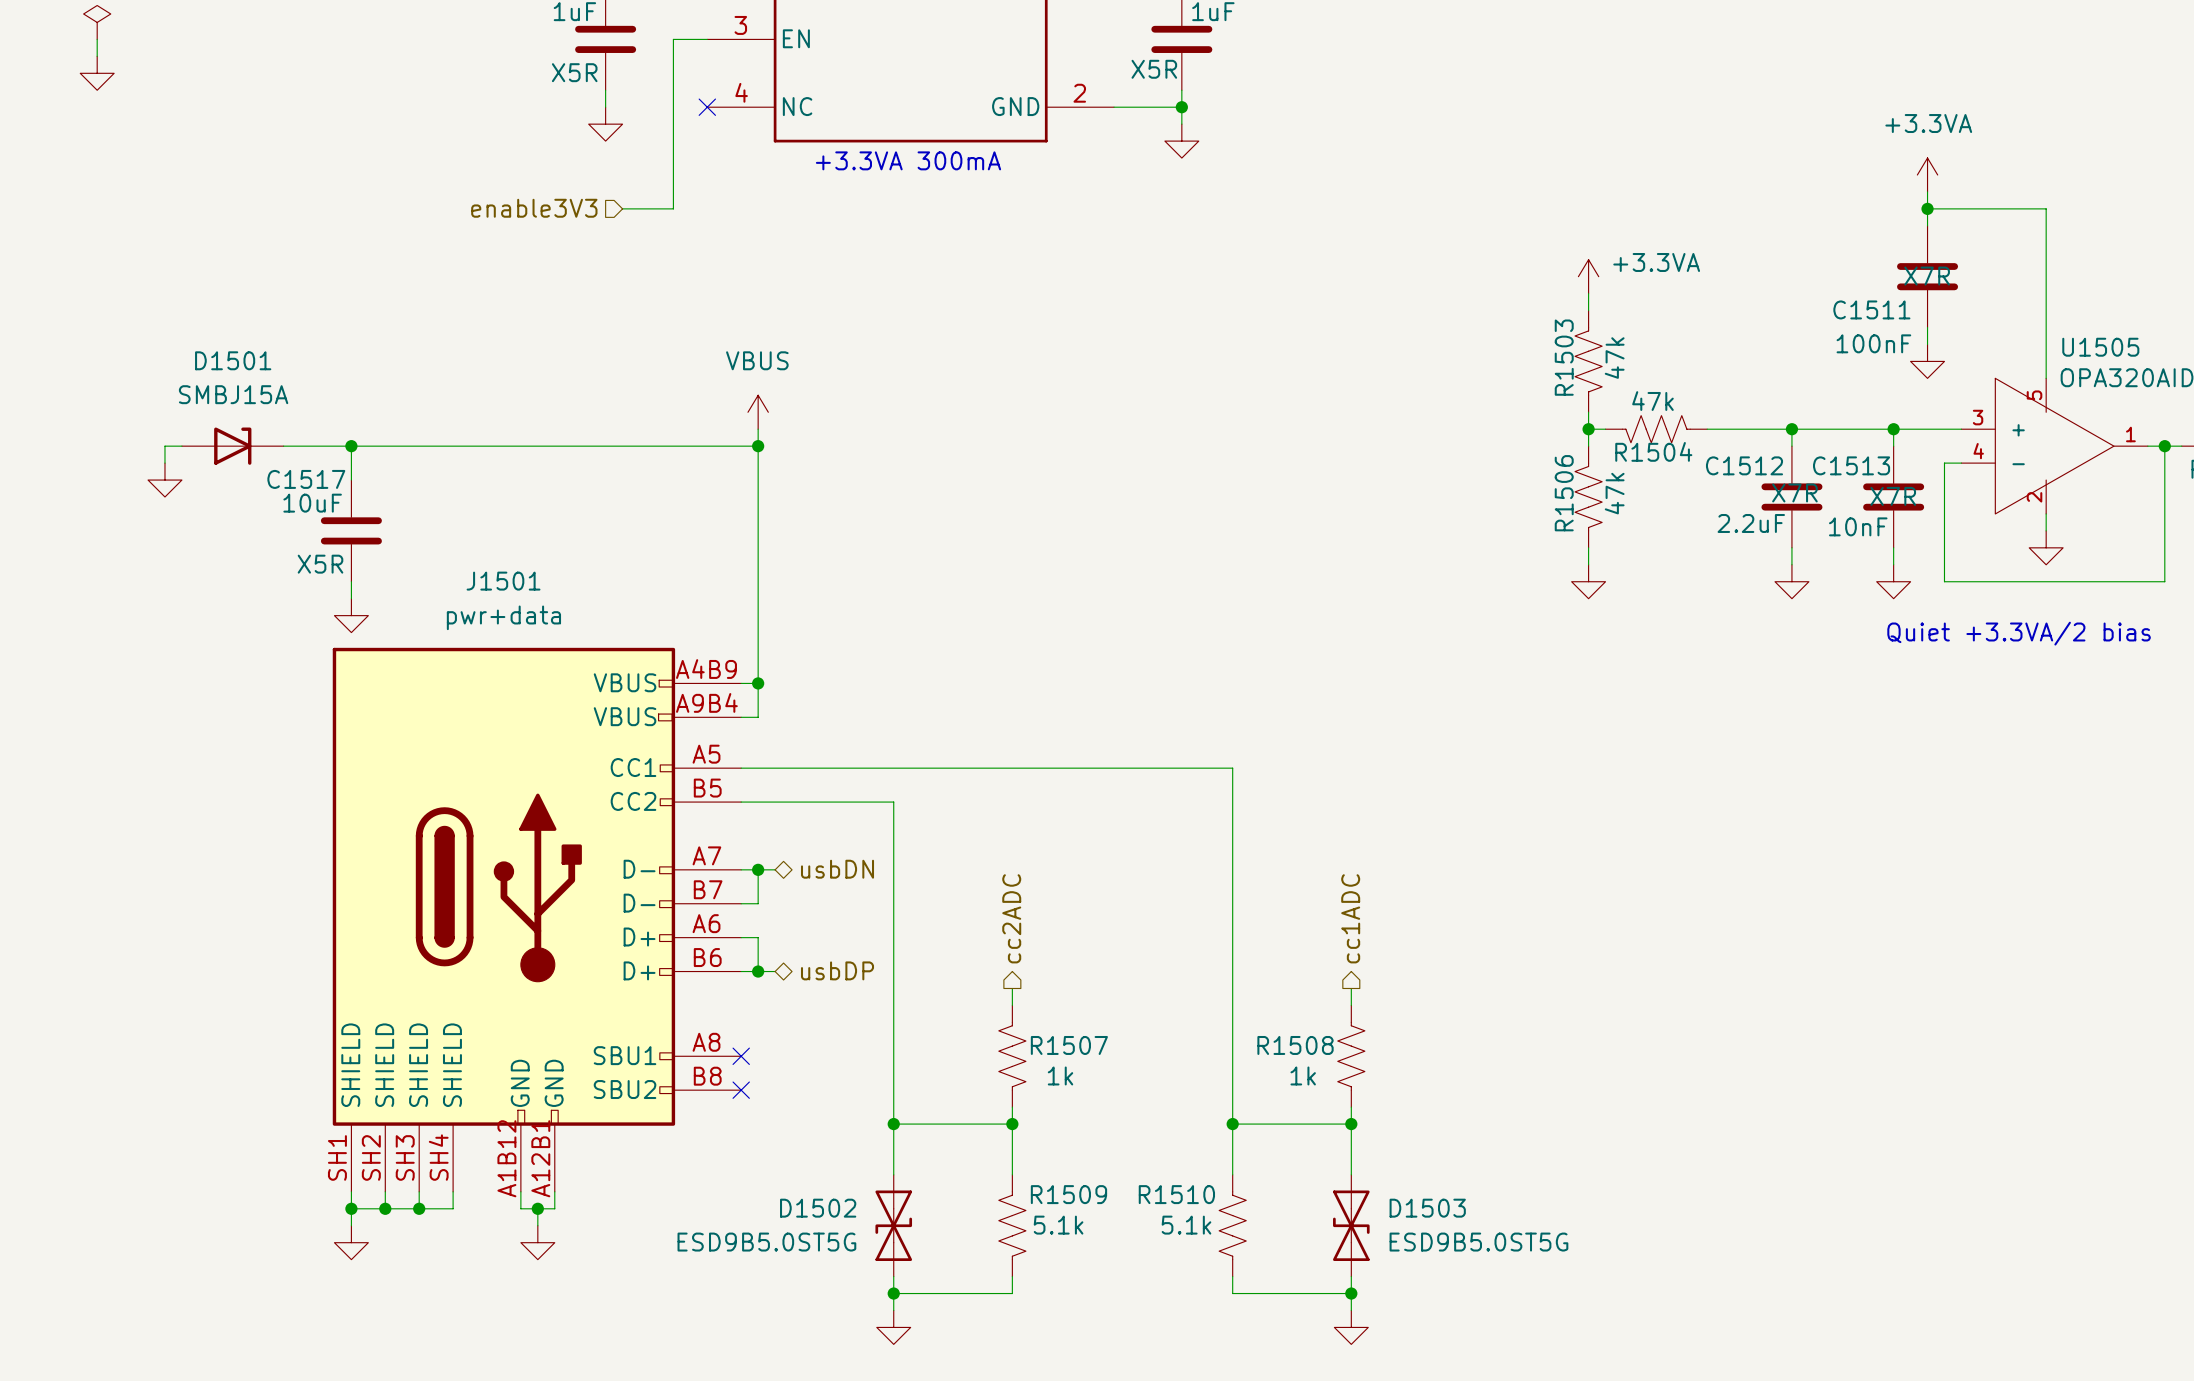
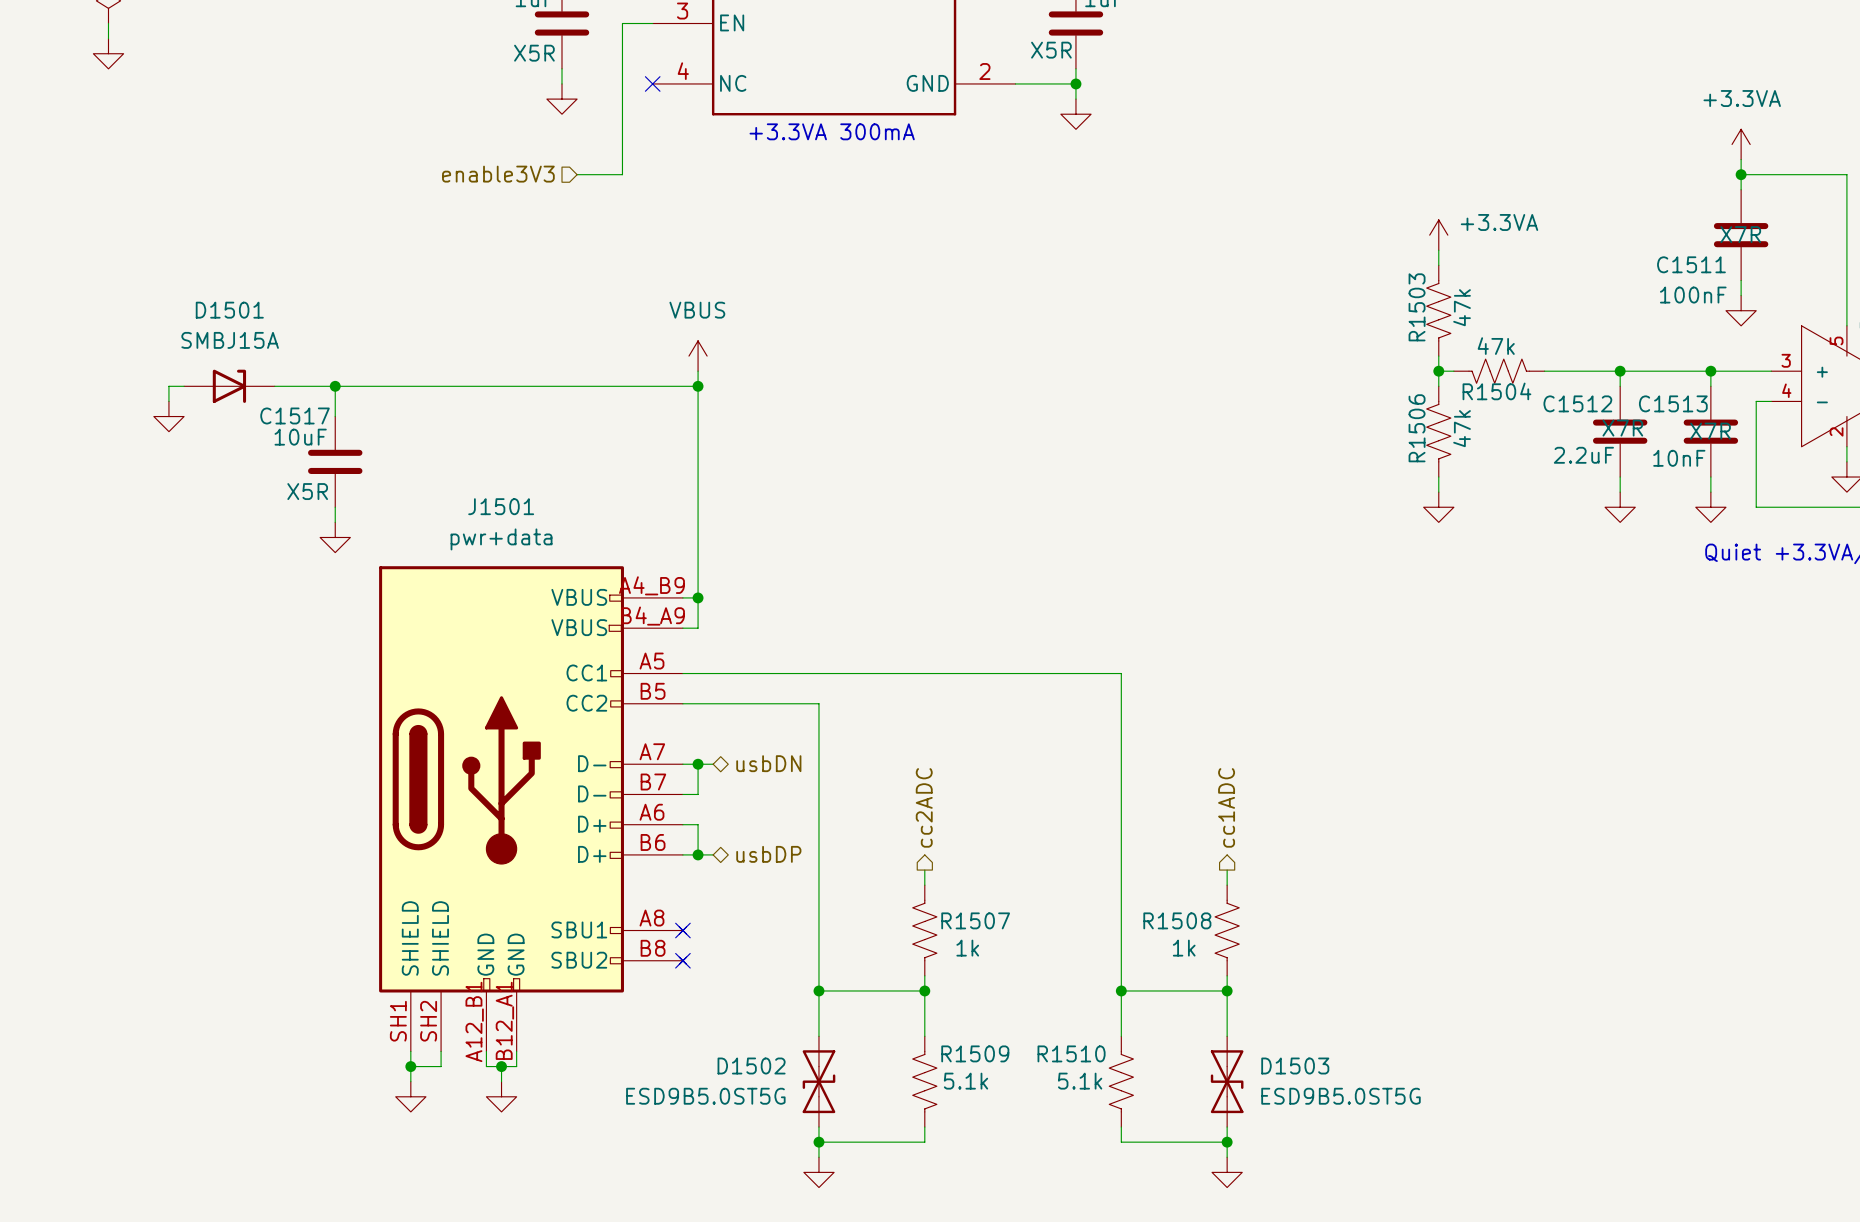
J1501 symbol: [332, 647, 742, 1192] -> [379, 566, 687, 1052]
wire: (351, 1191) (351, 1225) -> (410, 1051) (410, 1081)
wire: (385, 1191) (385, 1208) -> none
wire: (419, 1191) (419, 1208) -> none
wire: (453, 1191) (453, 1208) -> (441, 1051) (441, 1066) (425, 1066)
wire: (351, 1208) (436, 1208) -> none
junction: (351, 1208) -> none
junction: (385, 1208) -> none
junction position: (419, 1208) -> (410, 1066)
power symbol position: (351, 1242) -> (410, 1096)

